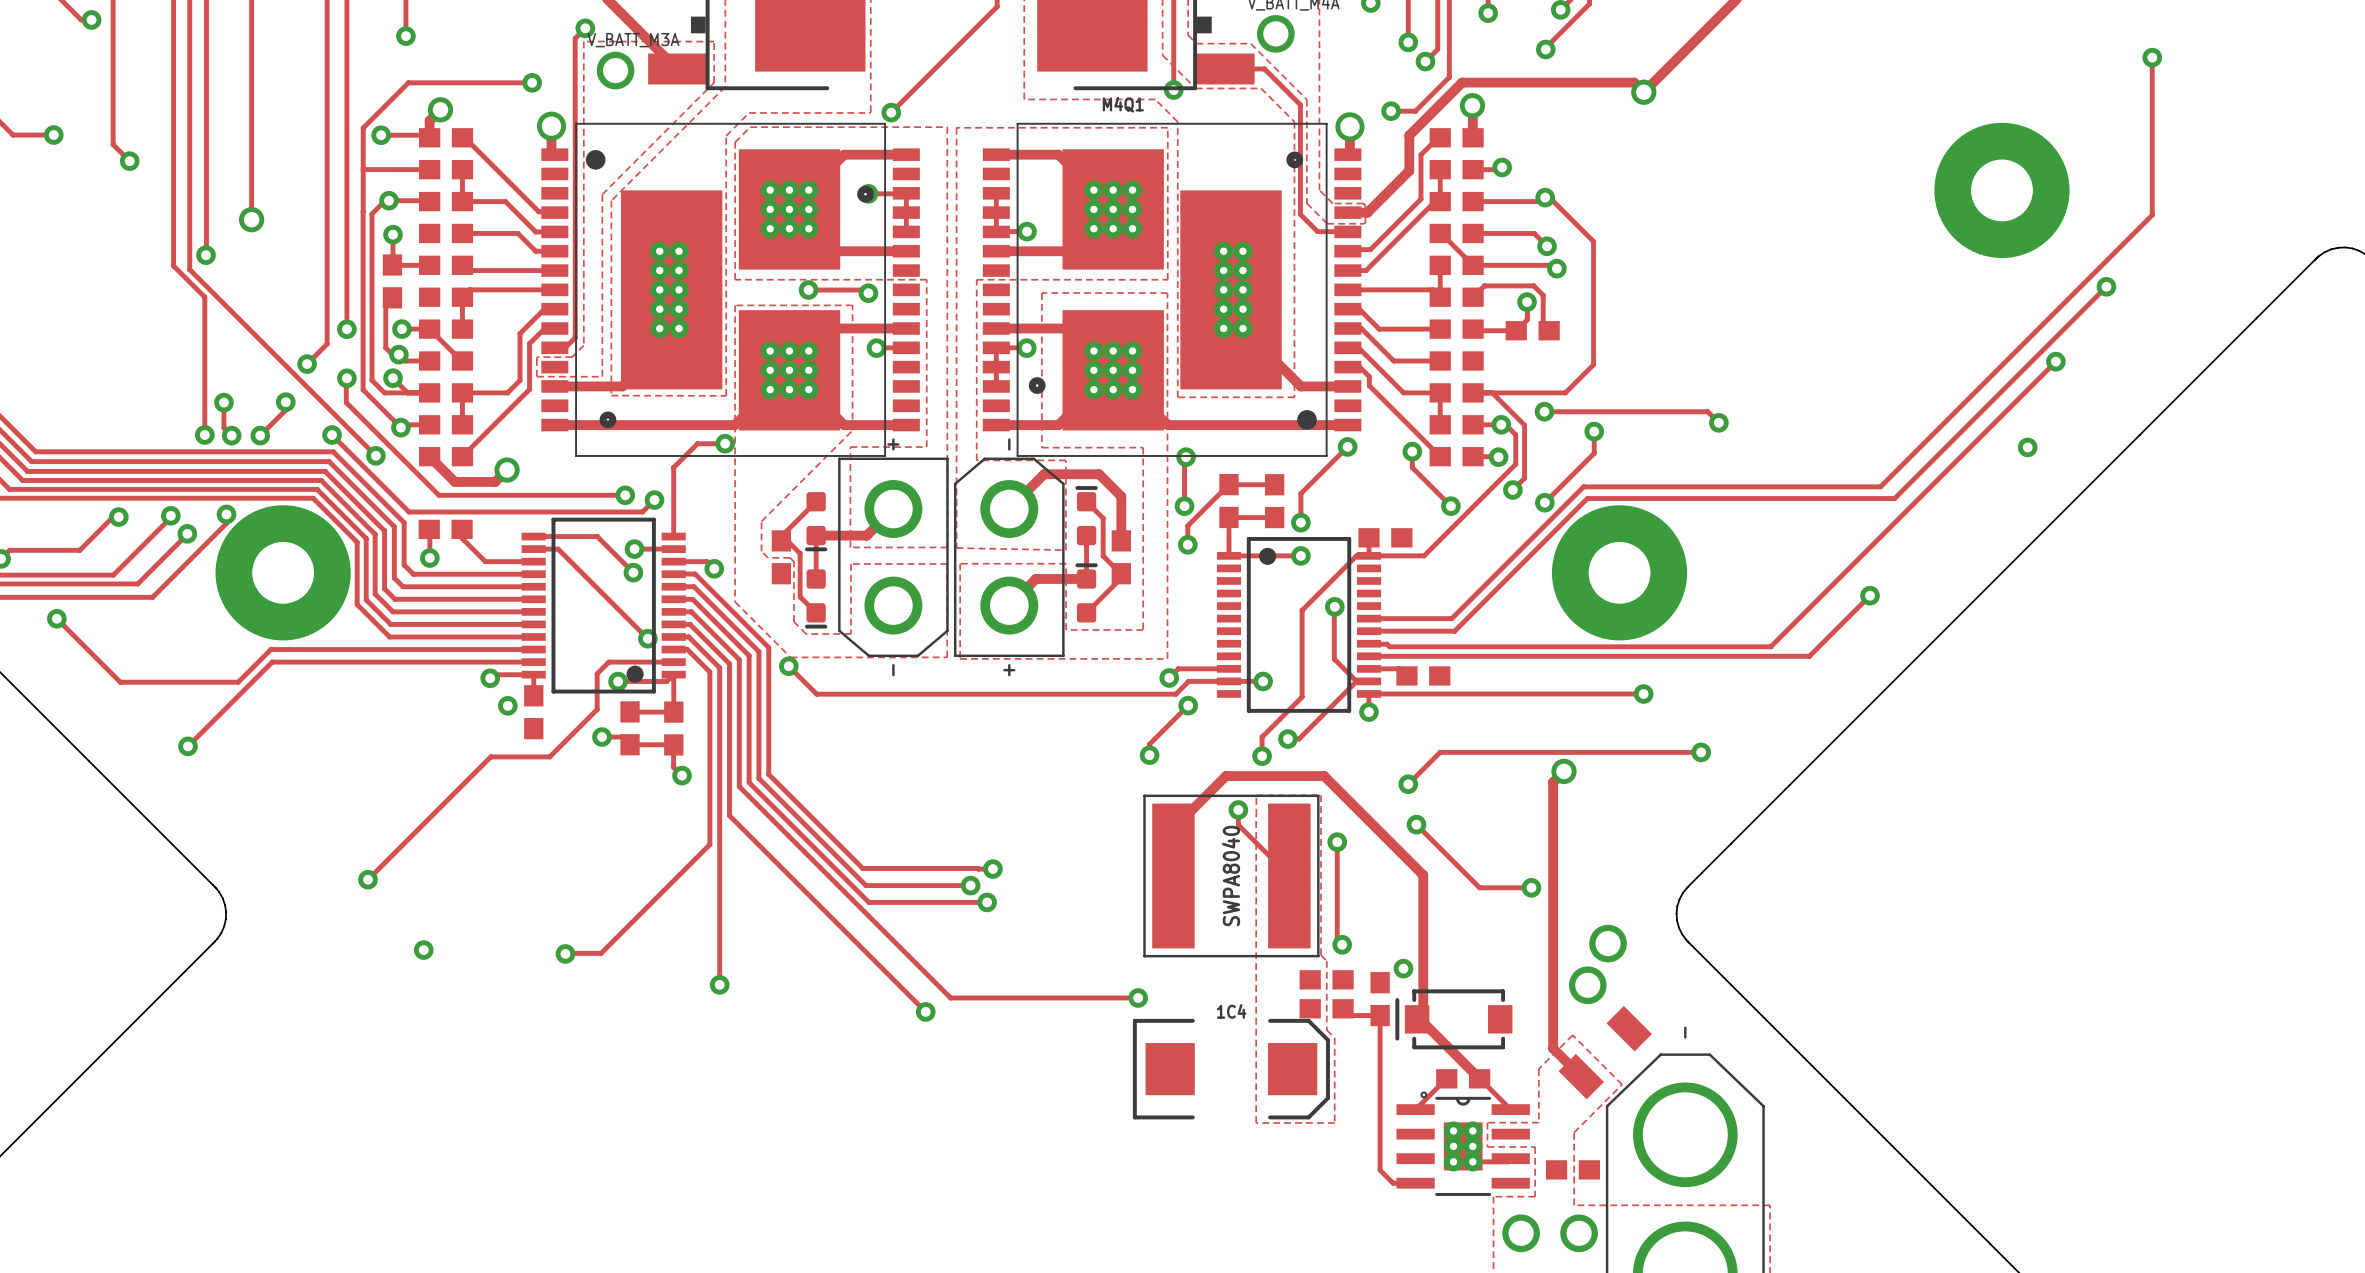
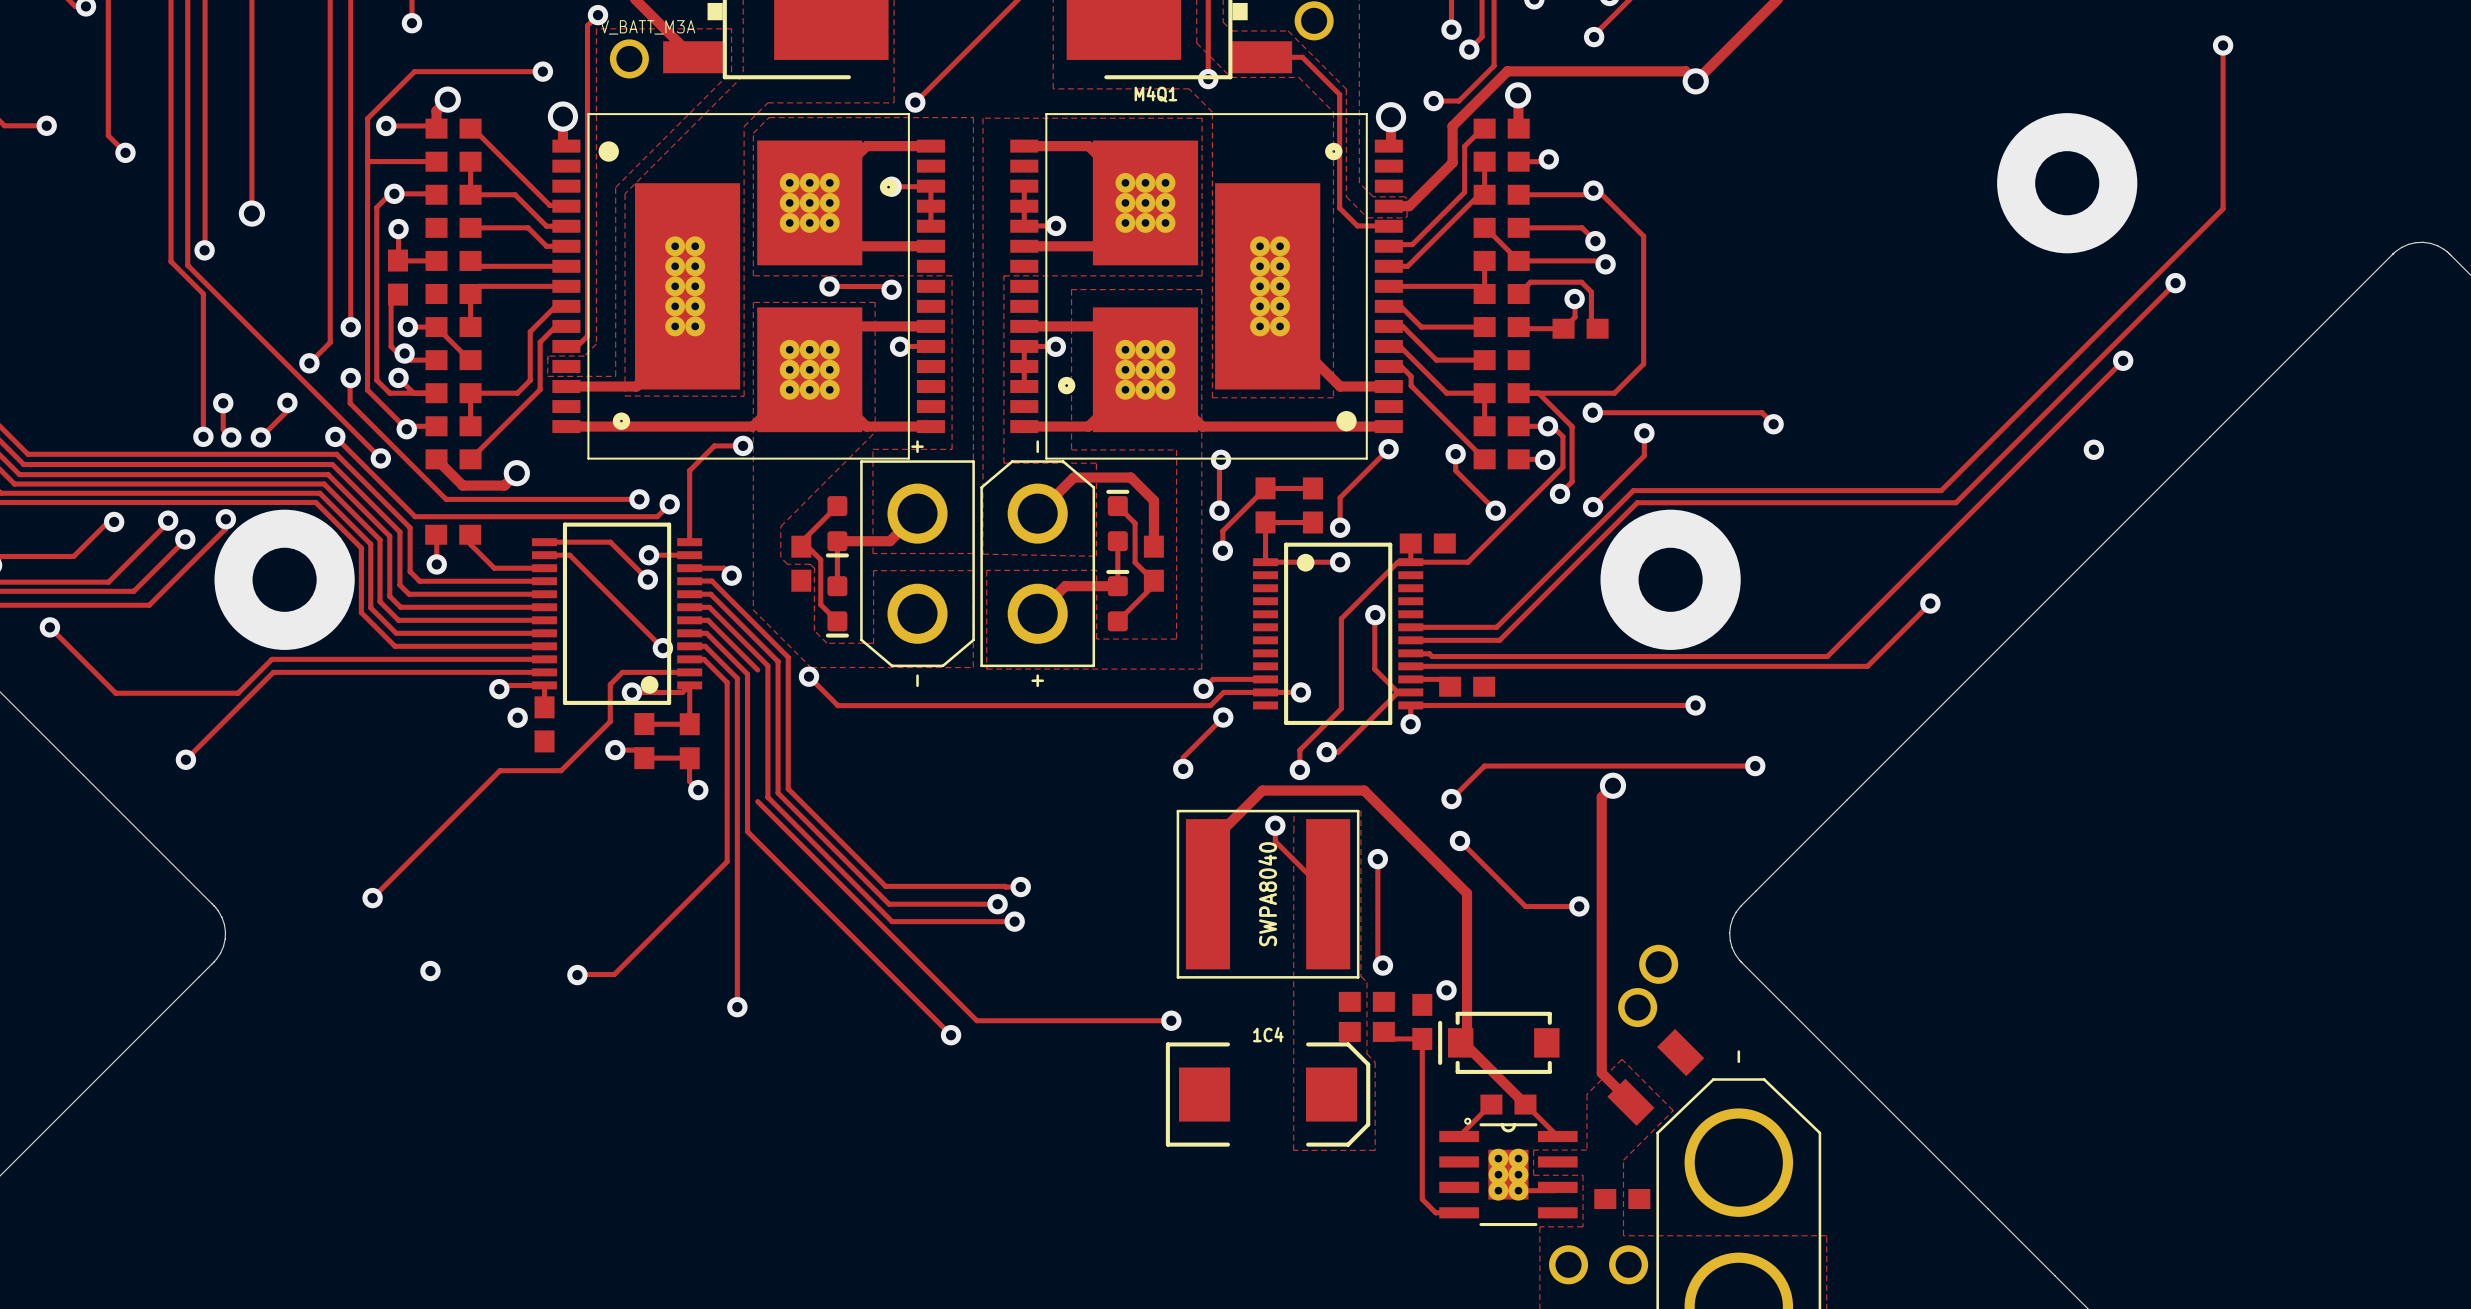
track: (739, 659) (739, 786) -> none

